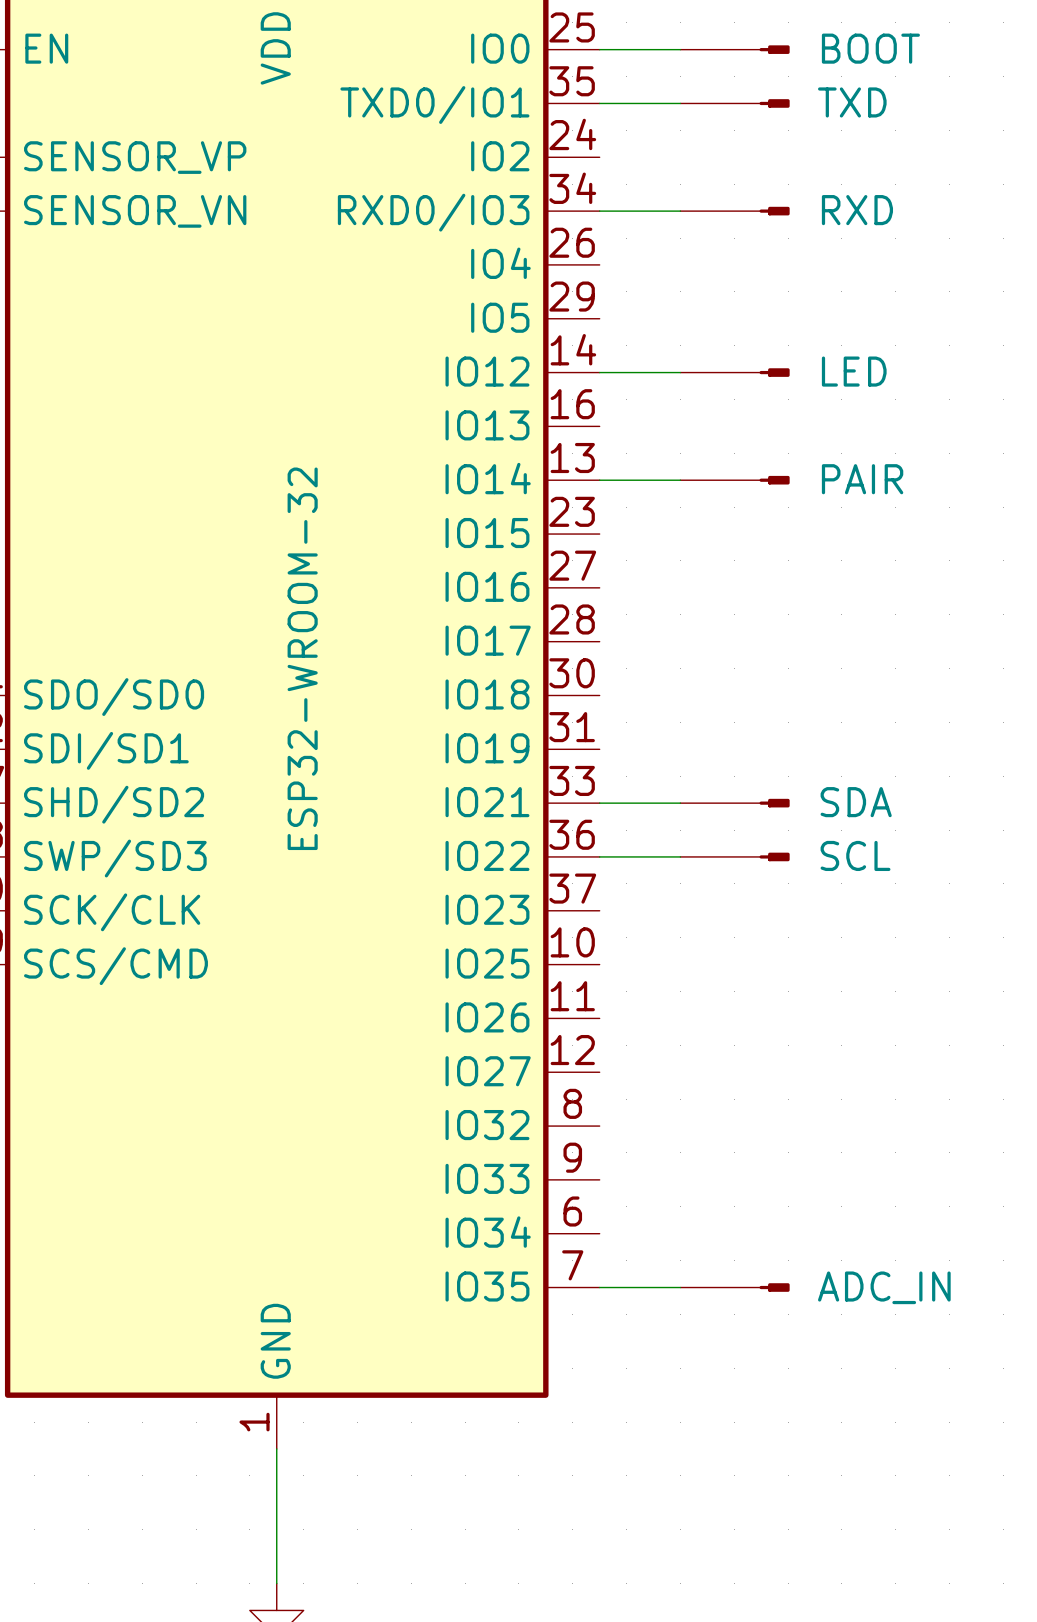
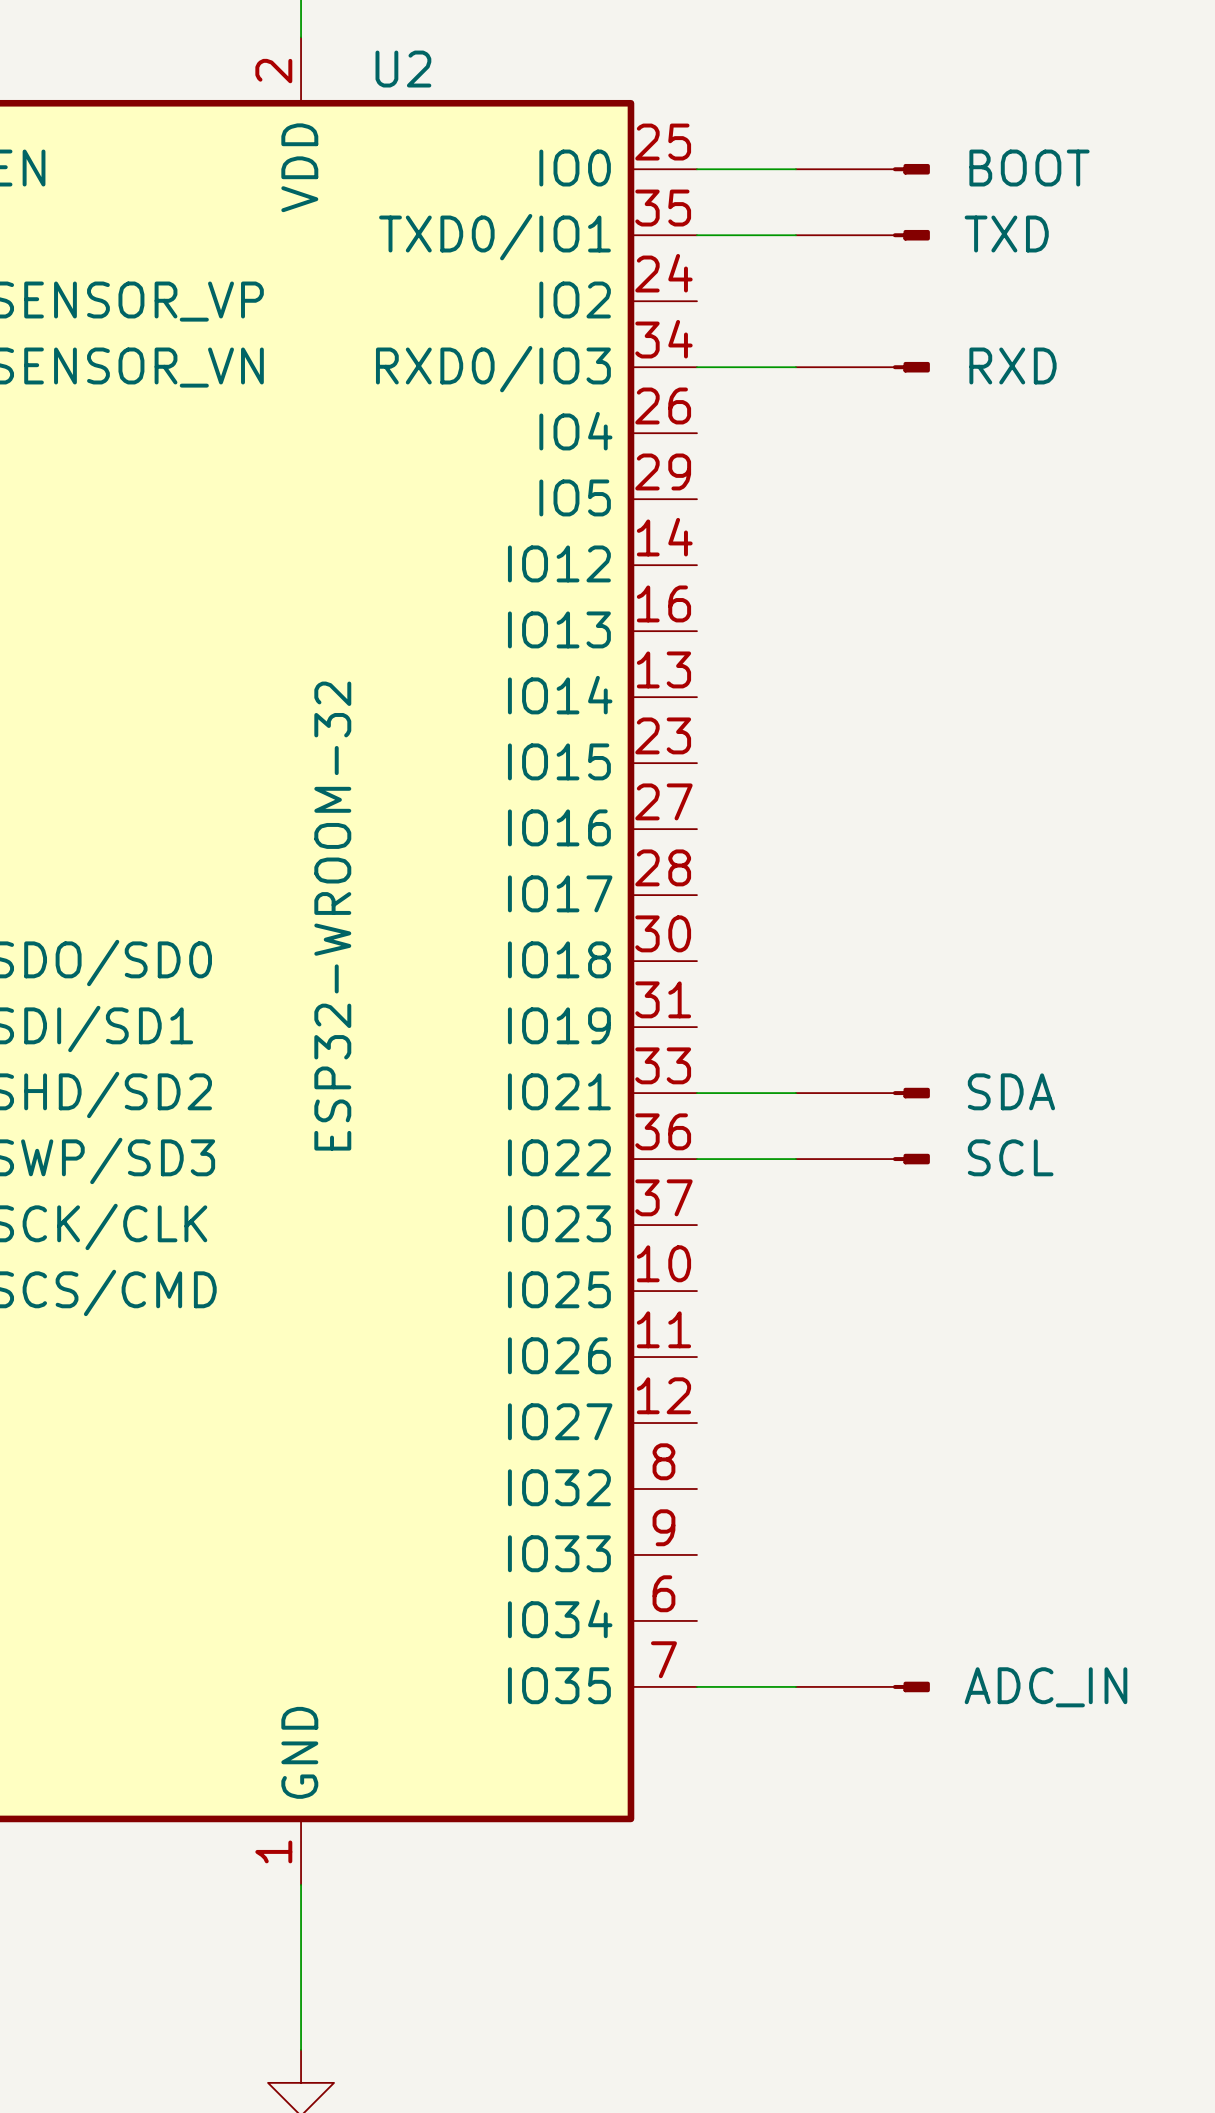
wire: (599, 372) (680, 372) -> none
part: LED (735, 372) -> none
wire: (599, 480) (680, 480) -> none
part: PAIR (735, 480) -> none

